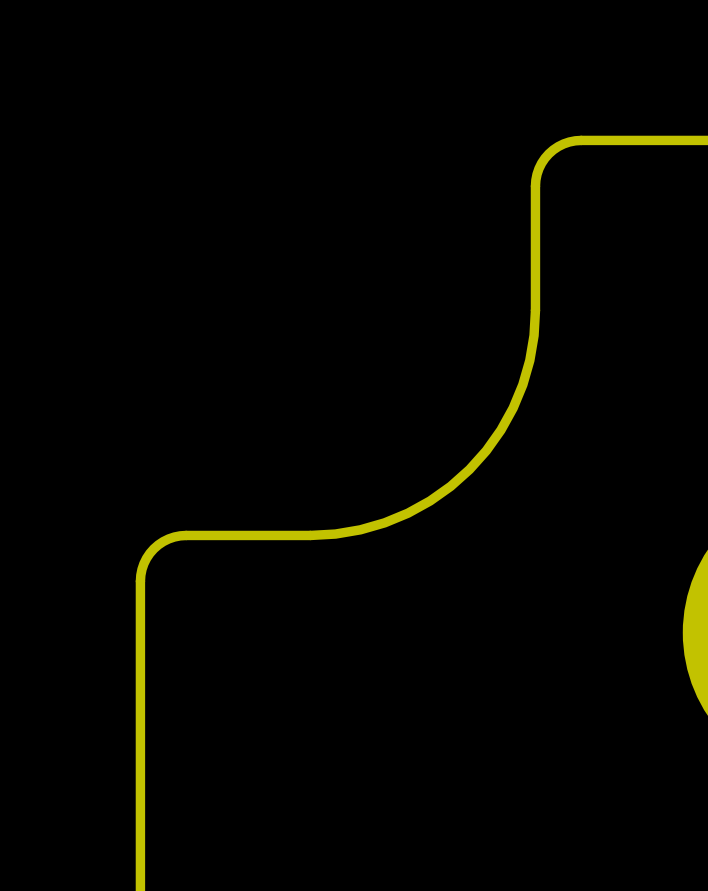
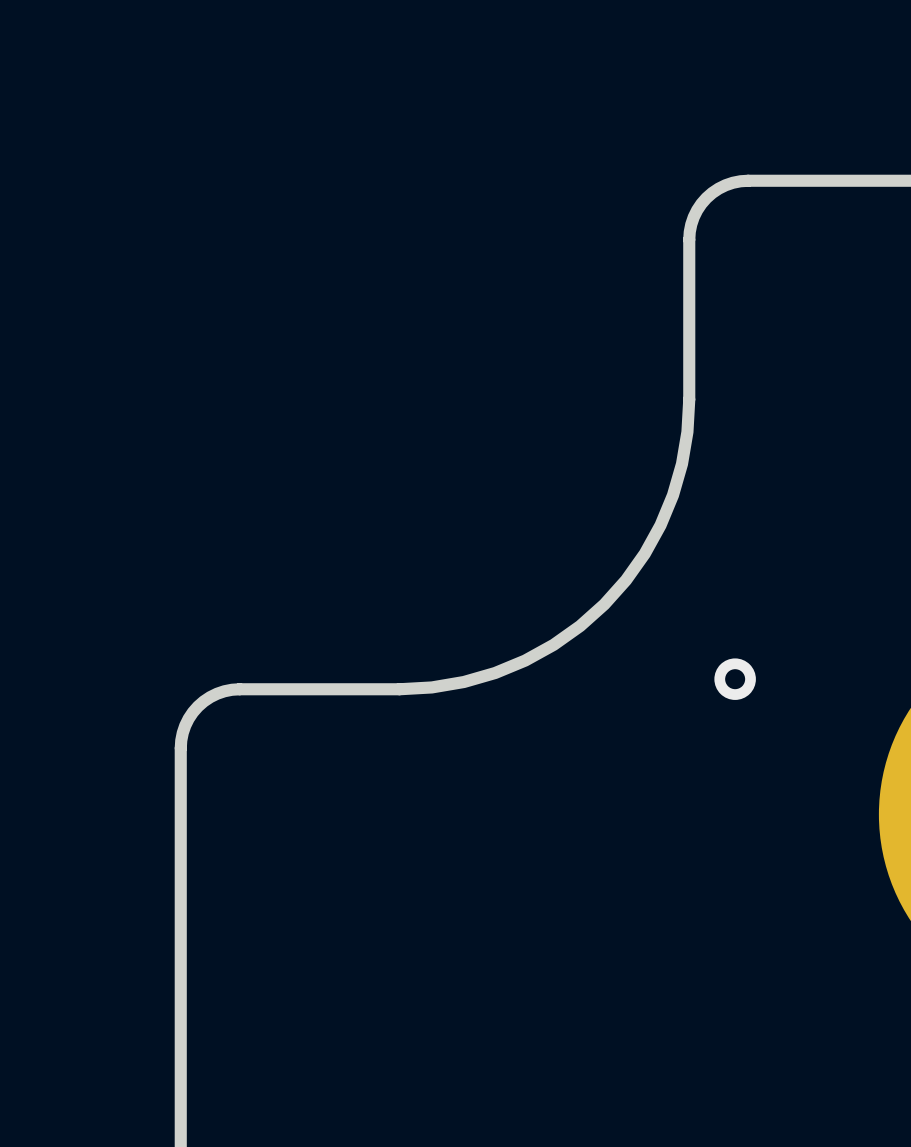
via: none -> (735, 679)

